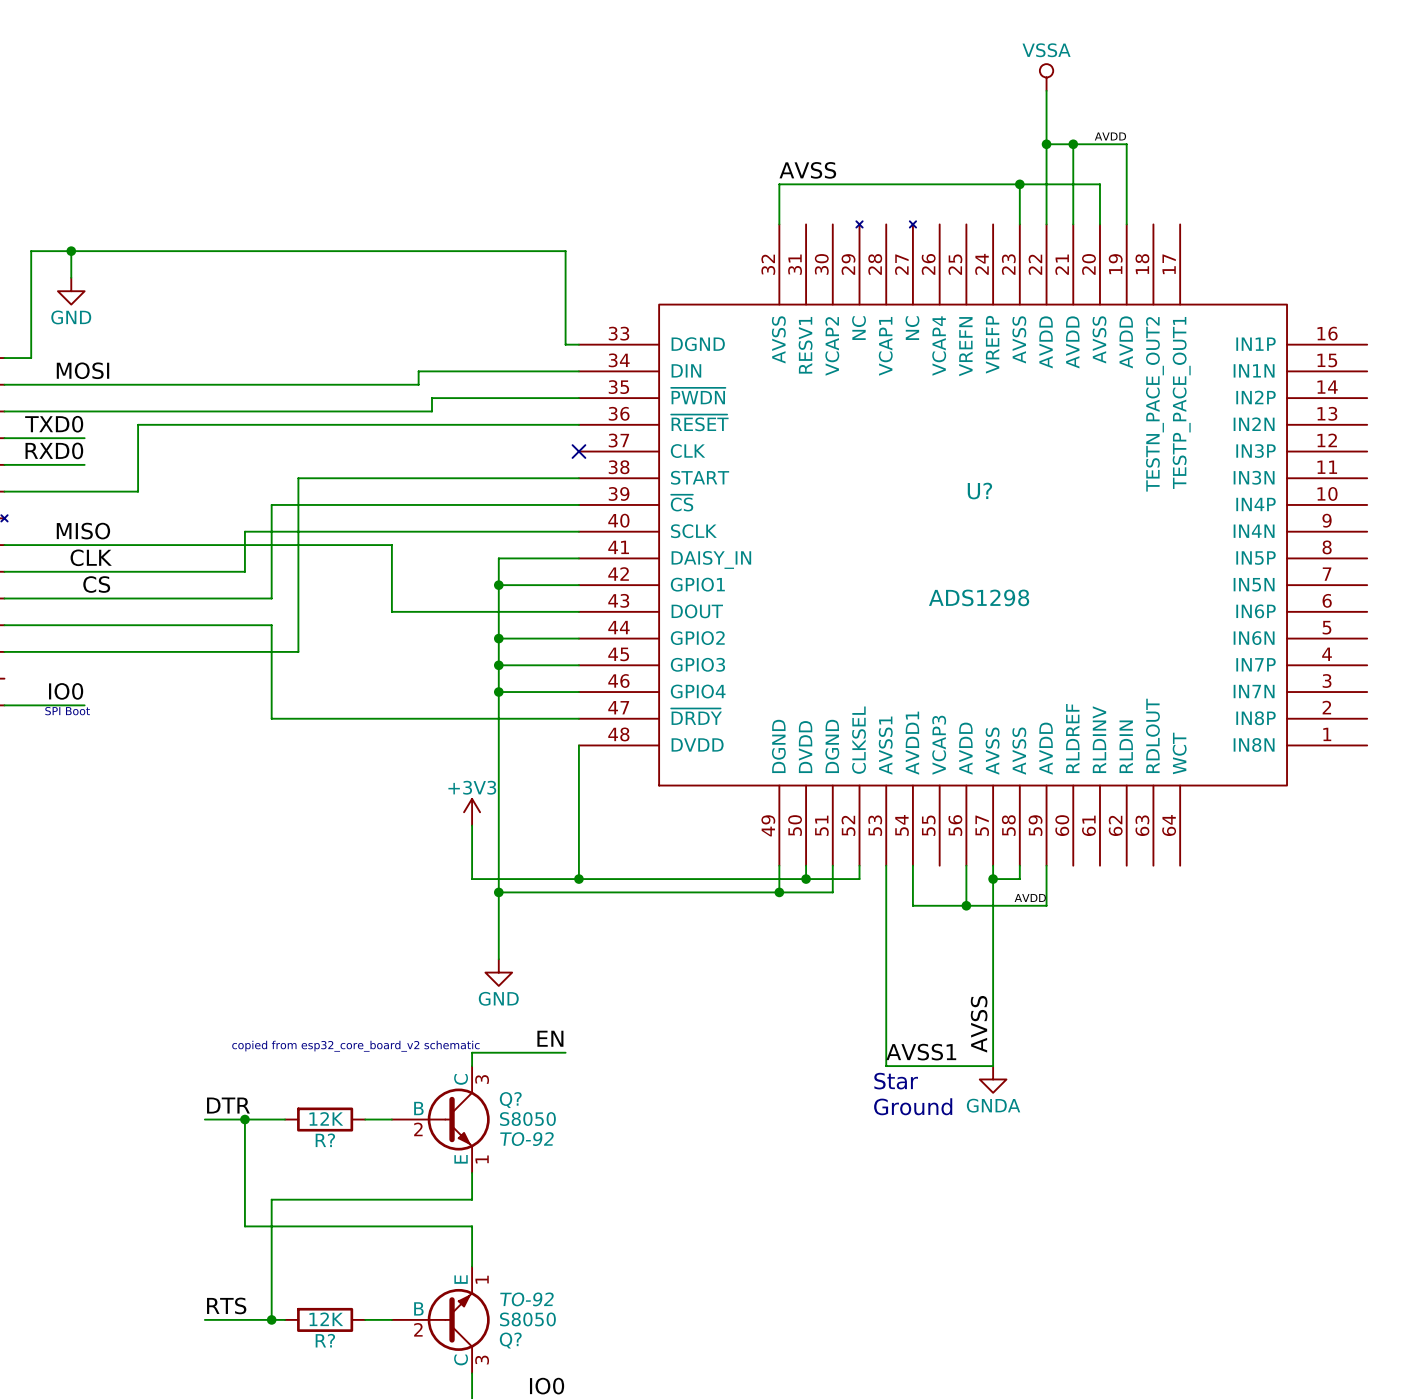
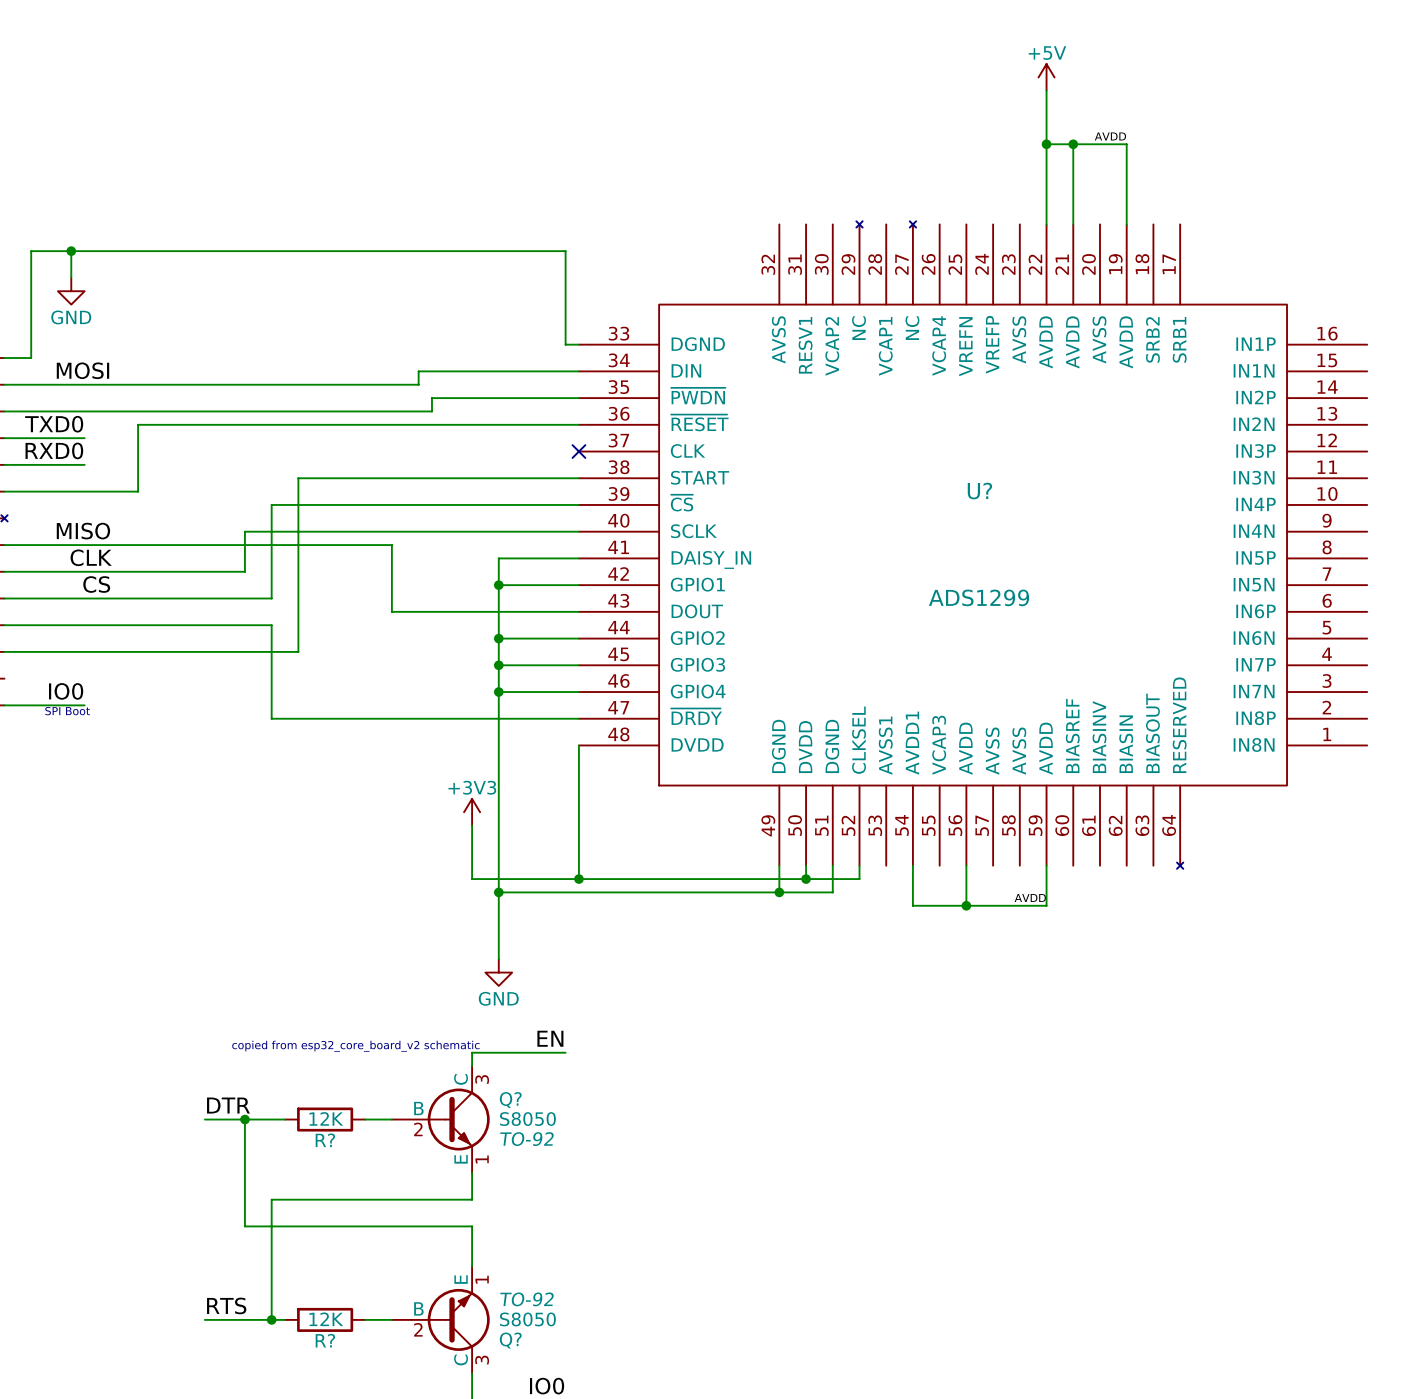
power symbol: VSSA (1046, 77) -> +5V (1046, 77)
label: AVSS (807, 170) -> none
wire: (1019, 184) (1019, 224) -> none
junction: (1019, 184) -> none
U? symbol: [578, 221, 1368, 866] -> [578, 221, 1368, 869]
wire: (779, 224) (779, 184) (1099, 184) (1099, 224) -> none
U? value: ADS1298 (979, 597) -> ADS1299 (979, 597)
wire: (886, 865) (886, 1066) (993, 1066) (993, 865) -> none
wire: (1019, 865) (1019, 879) (993, 879) -> none
junction: (993, 879) -> none
label: AVSS (979, 1024) -> none
label: AVSS1 (921, 1052) -> none
power symbol: GNDA (993, 1079) -> none
text: Star (896, 1081) -> none
text: Ground (913, 1106) -> none

